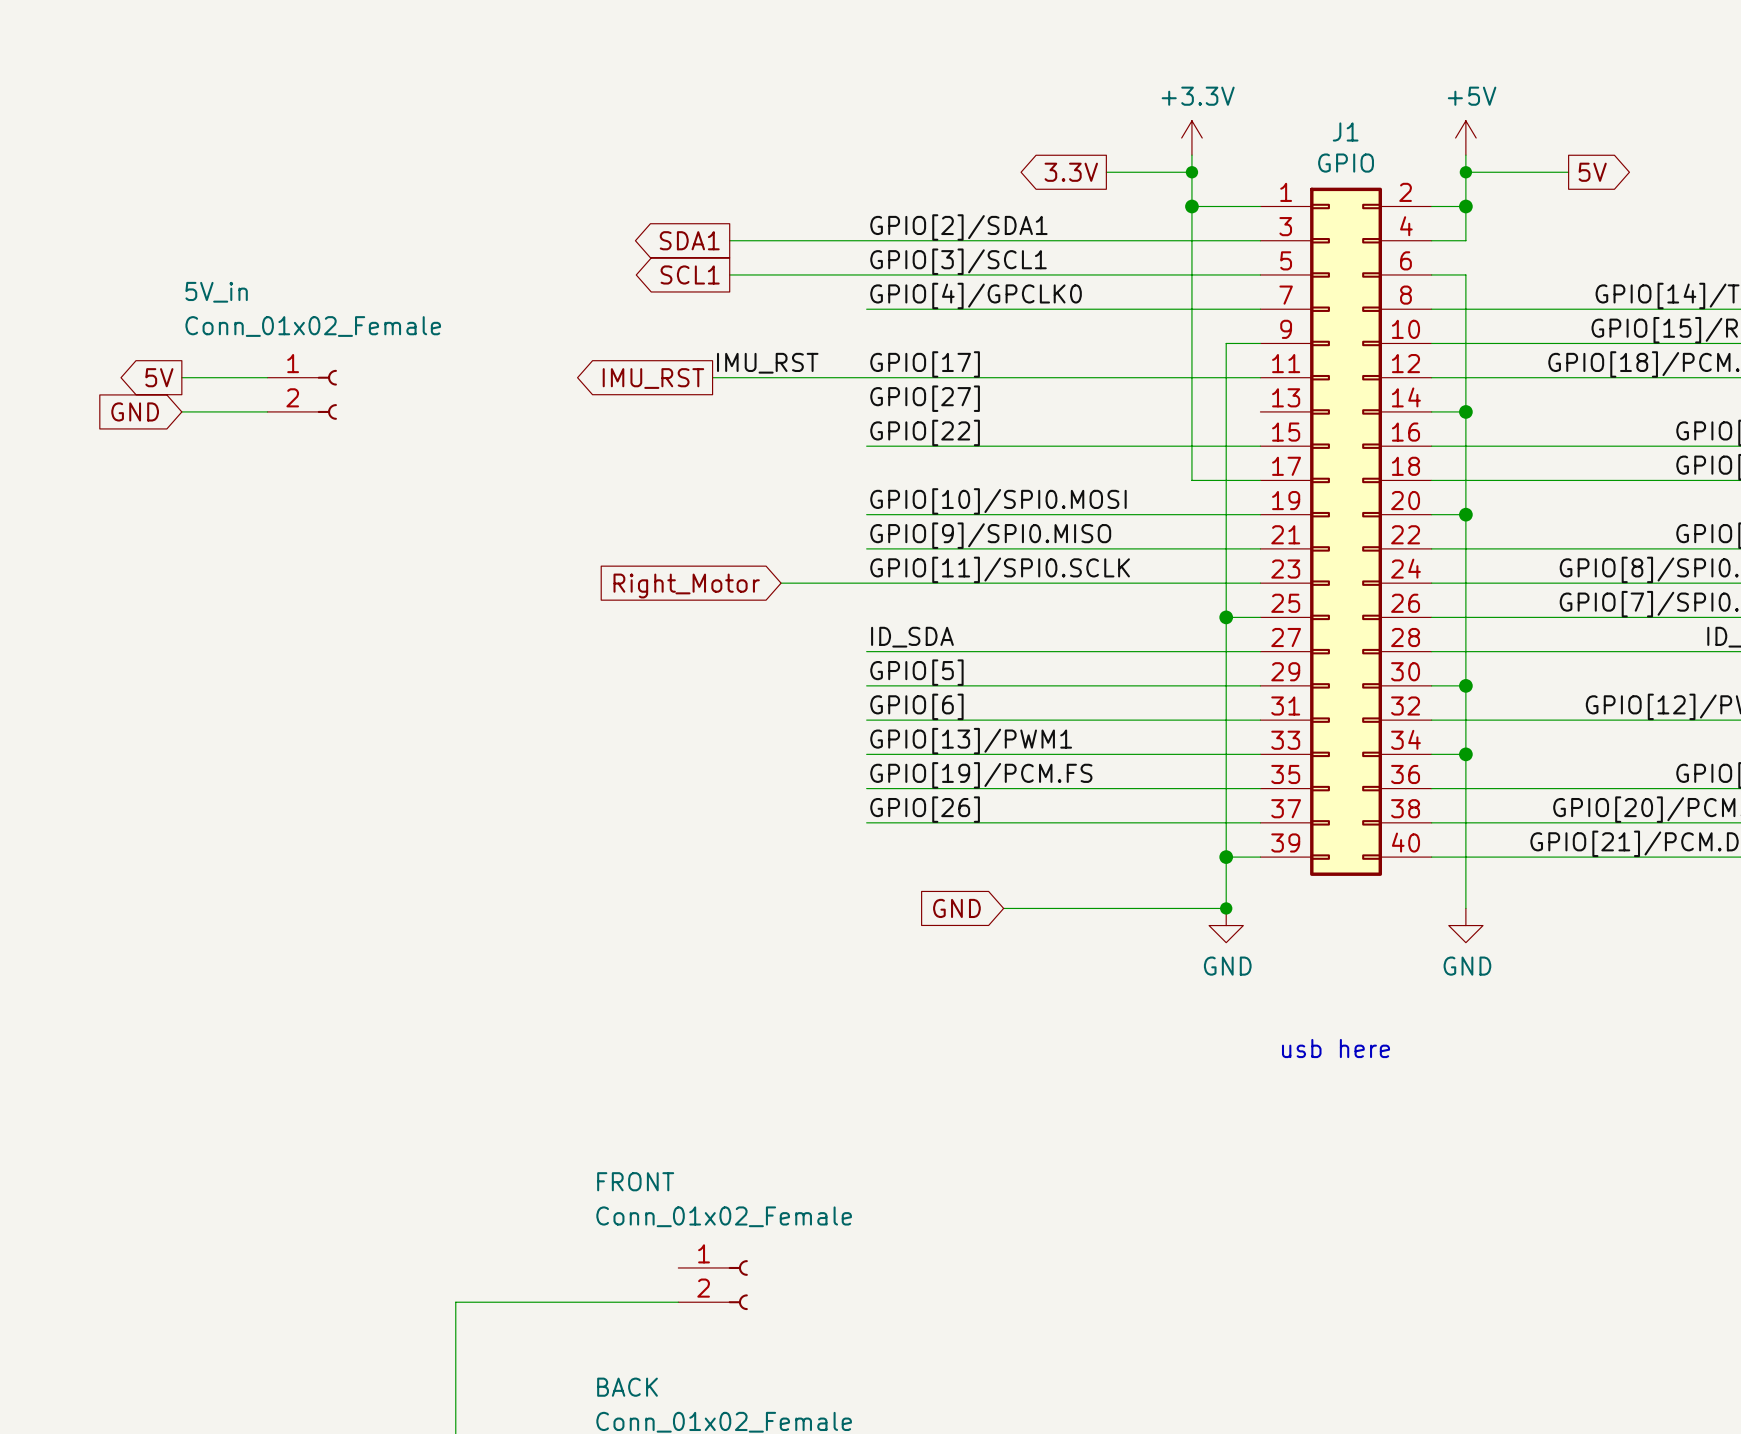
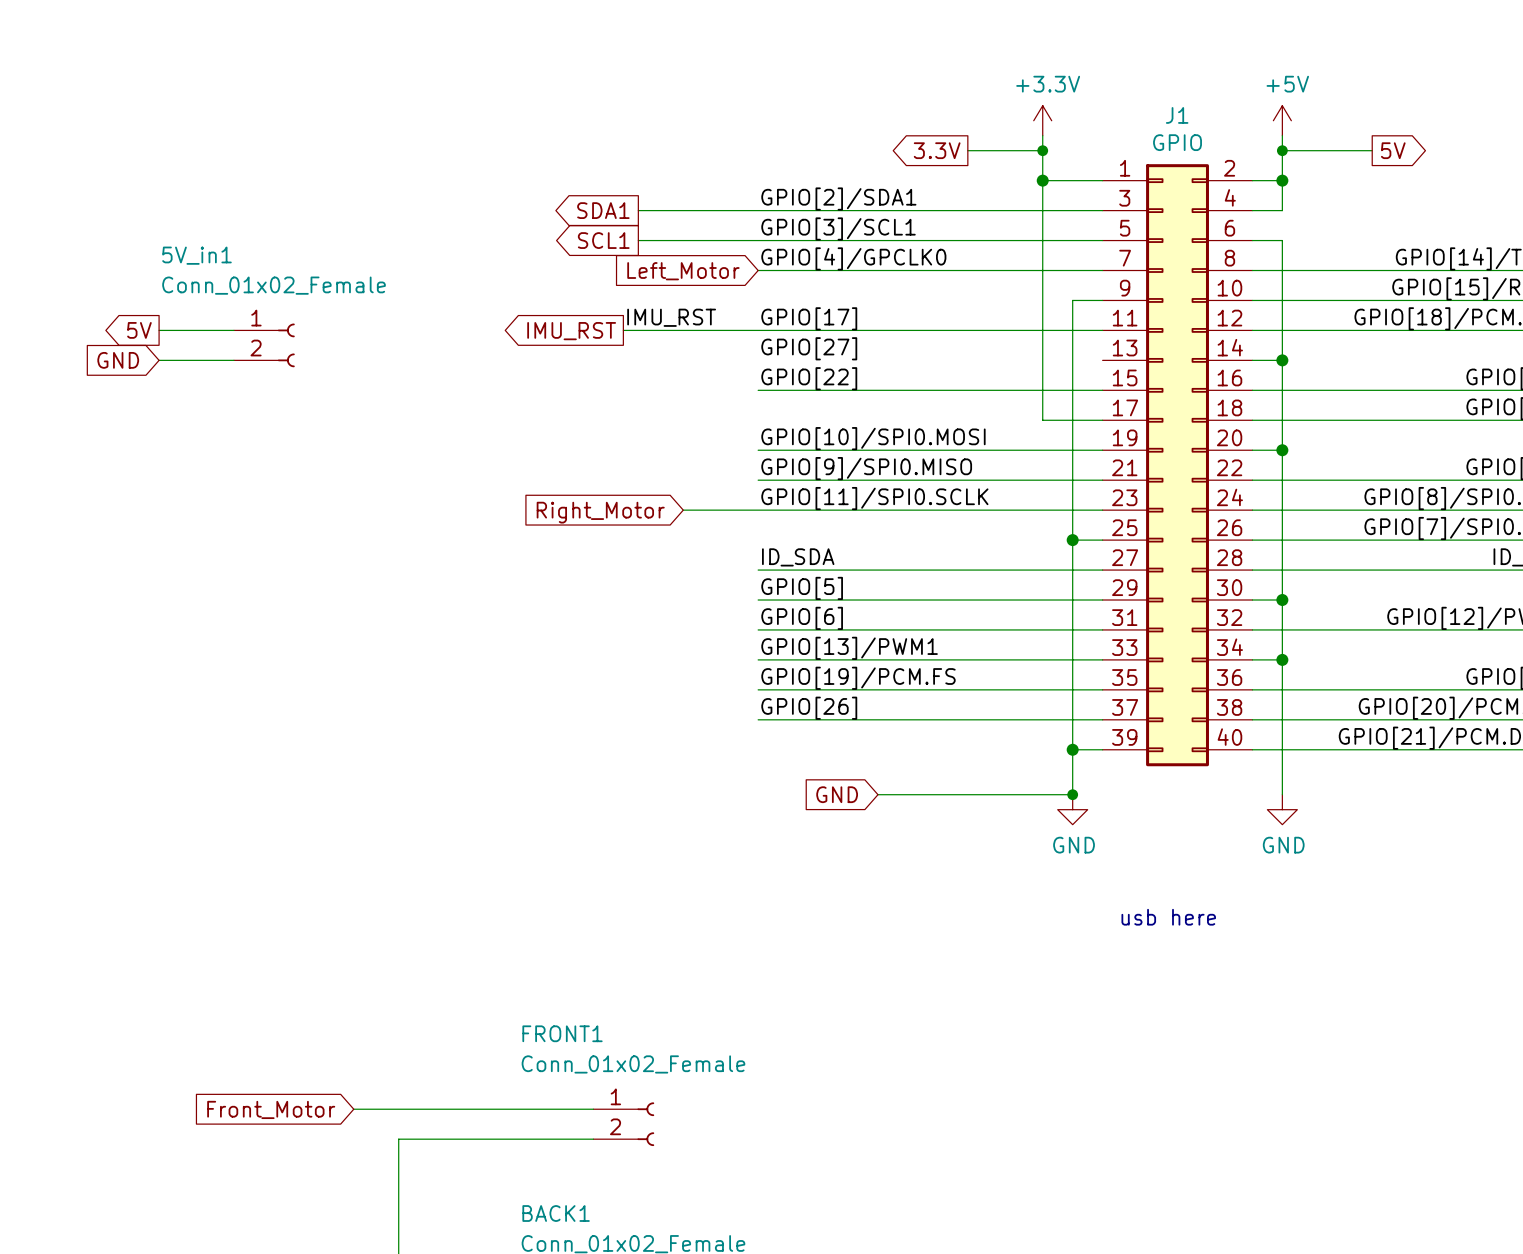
5V_in name: 5V_in (216, 292) -> 5V_in1 (196, 255)
global label: none -> Left_Motor (683, 271)
FRONT name: FRONT (635, 1181) -> FRONT1 (562, 1033)
wire: none -> (353, 1109) (593, 1109)
global label: none -> Front_Motor (271, 1109)
BACK name: BACK (627, 1387) -> BACK1 (556, 1213)

